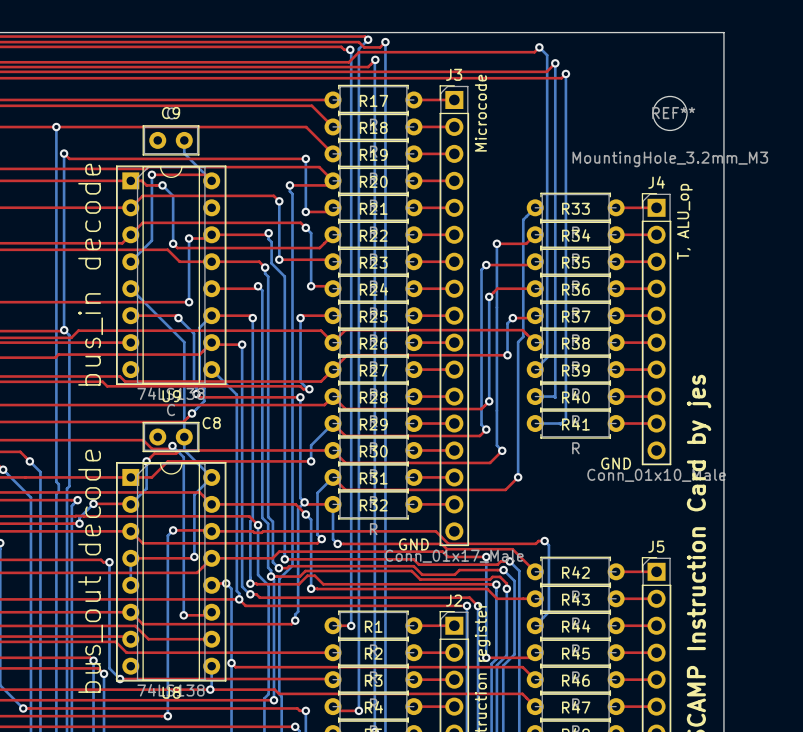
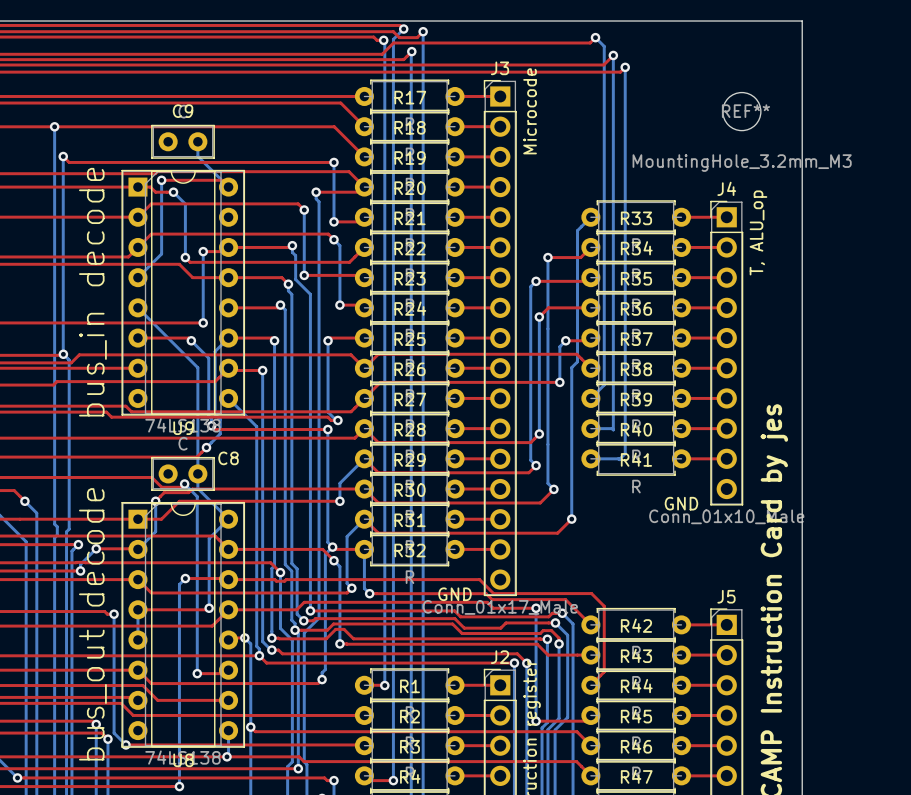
bottom track: (544, 541) (548, 545) (548, 612) (535, 625) -> none
top track: (544, 541) (538, 541) (535, 543) -> (590, 685) (604, 671) (604, 606) (591, 593)
via: (544, 541) -> none

